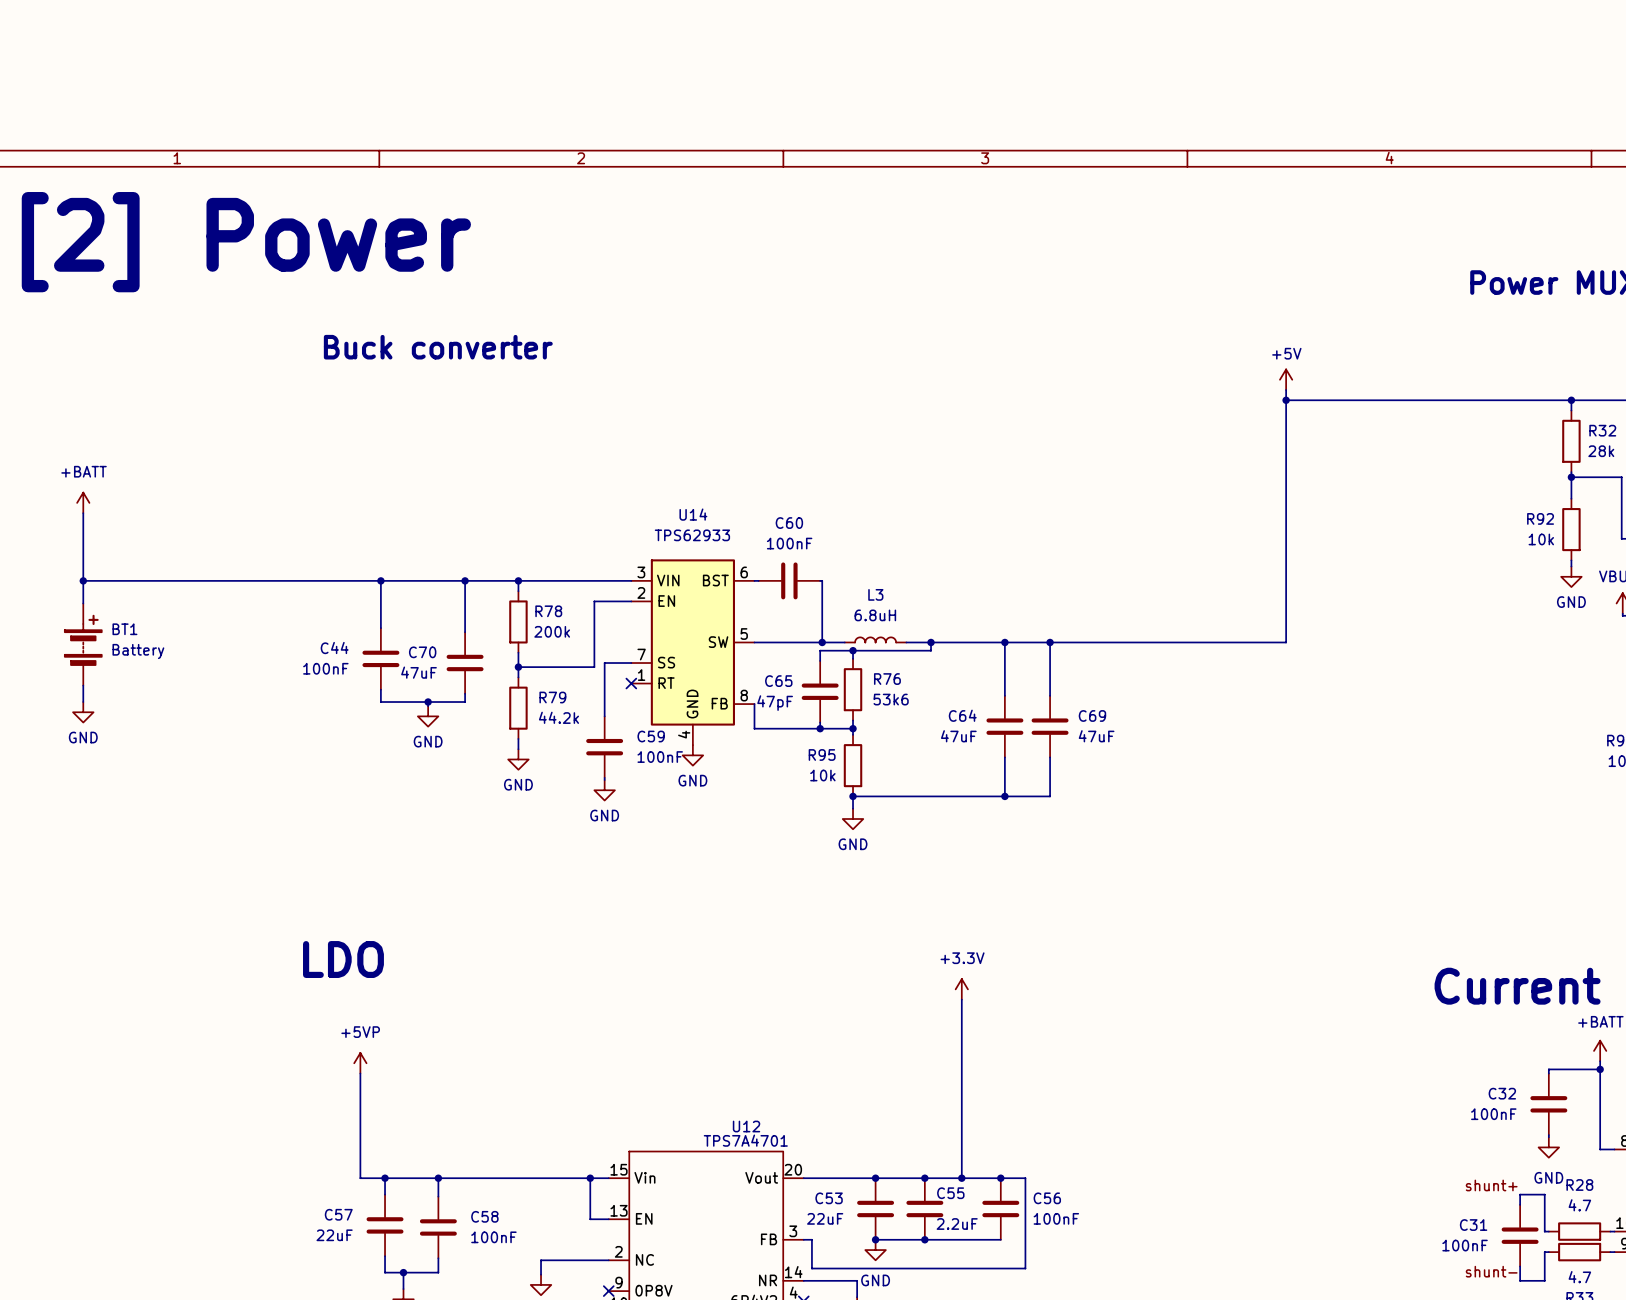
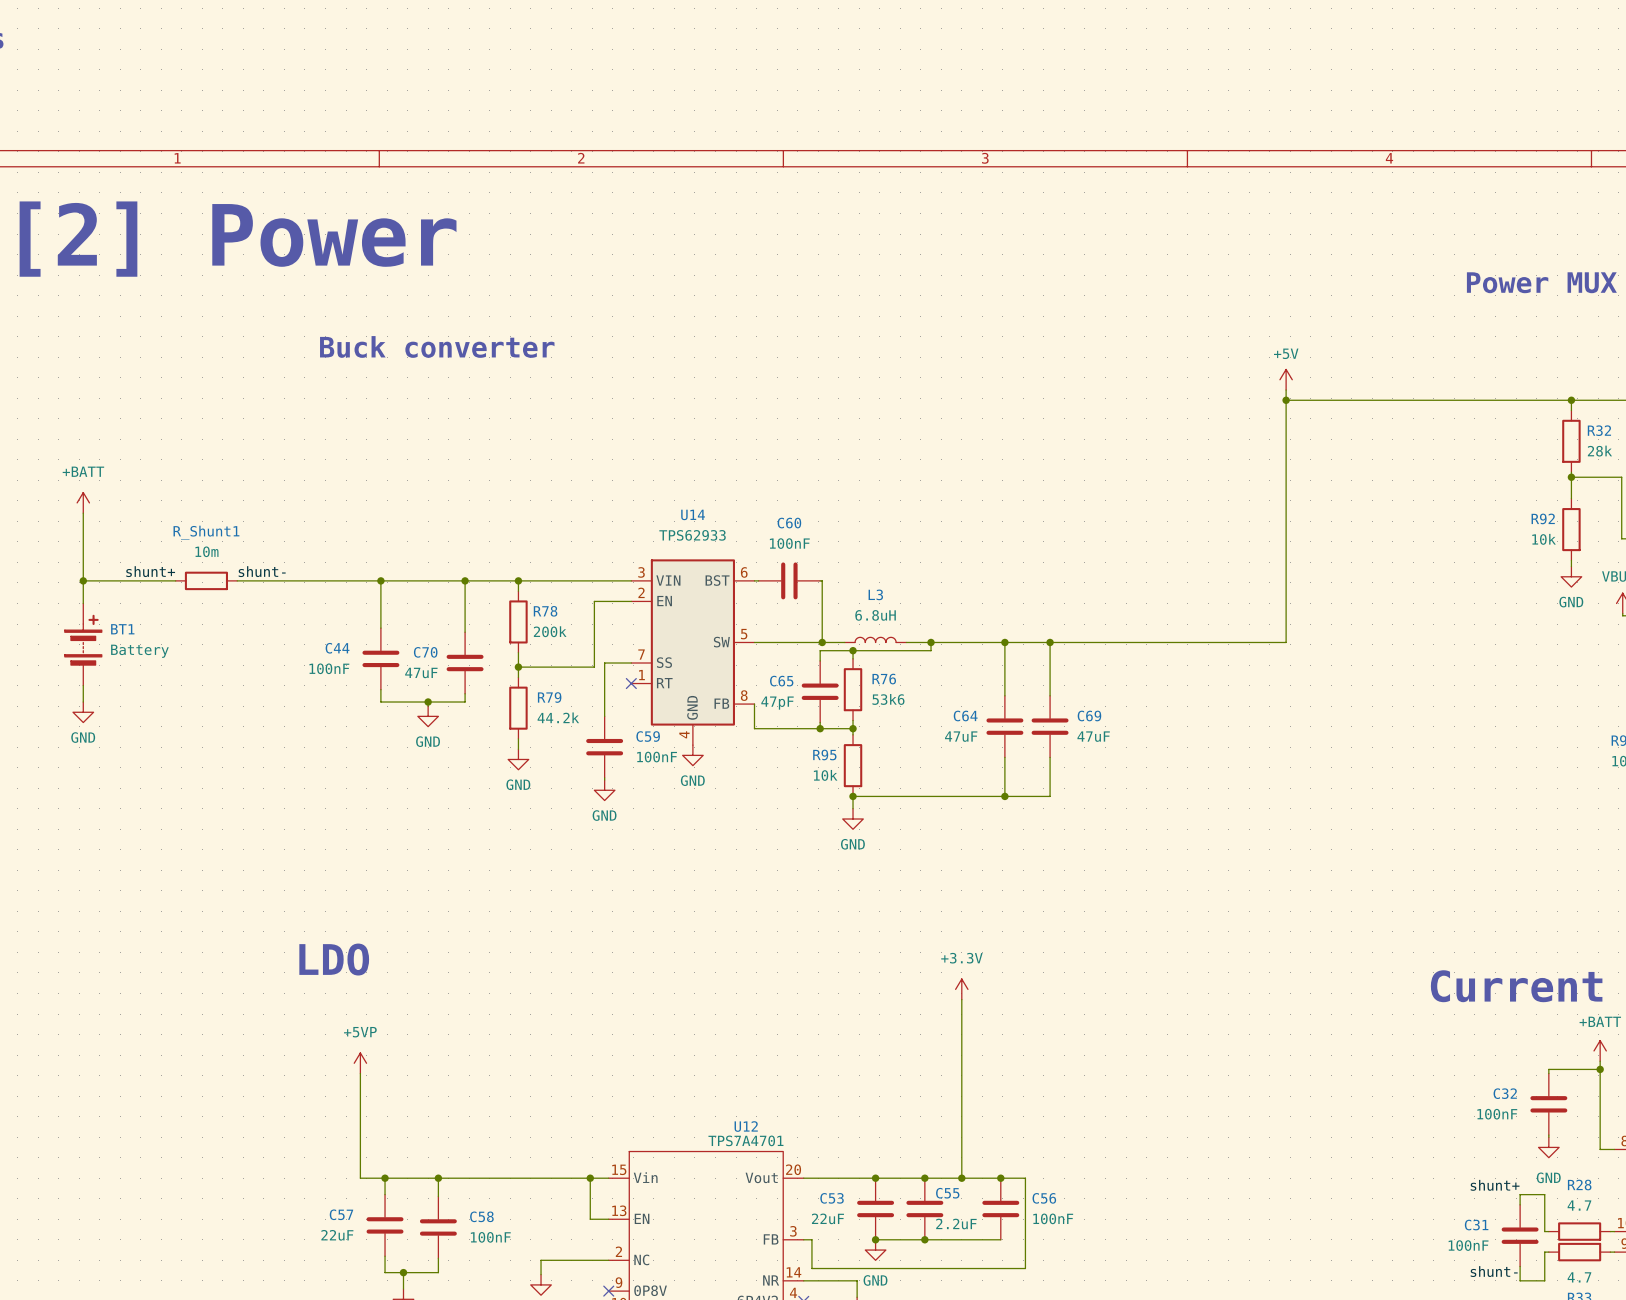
label: none -> shunt+ (150, 571)
label: none -> shunt- (262, 571)
wire: (175, 580) (237, 580) -> none
R_Shunt1: none -> 10m (206, 580)

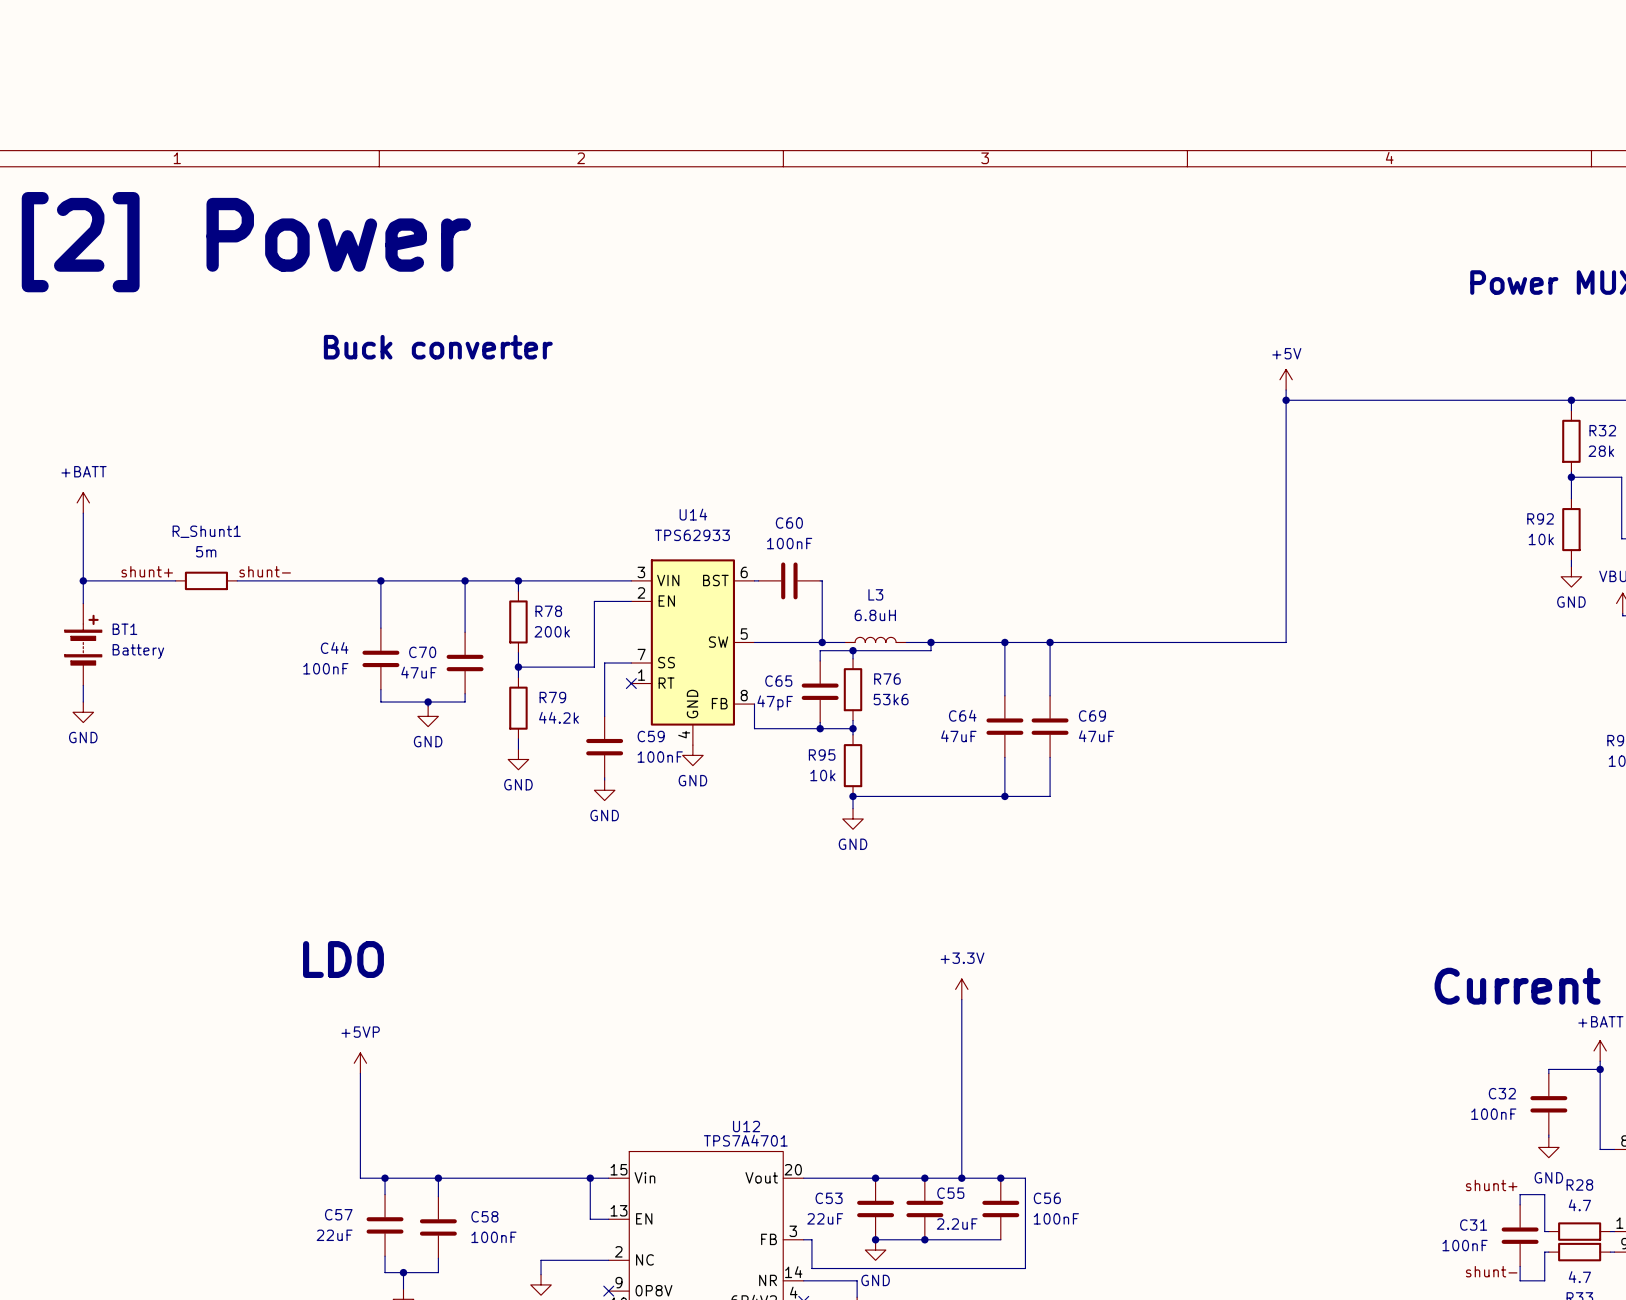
R_Shunt1 value: 10m (206, 551) -> 5m (206, 551)

